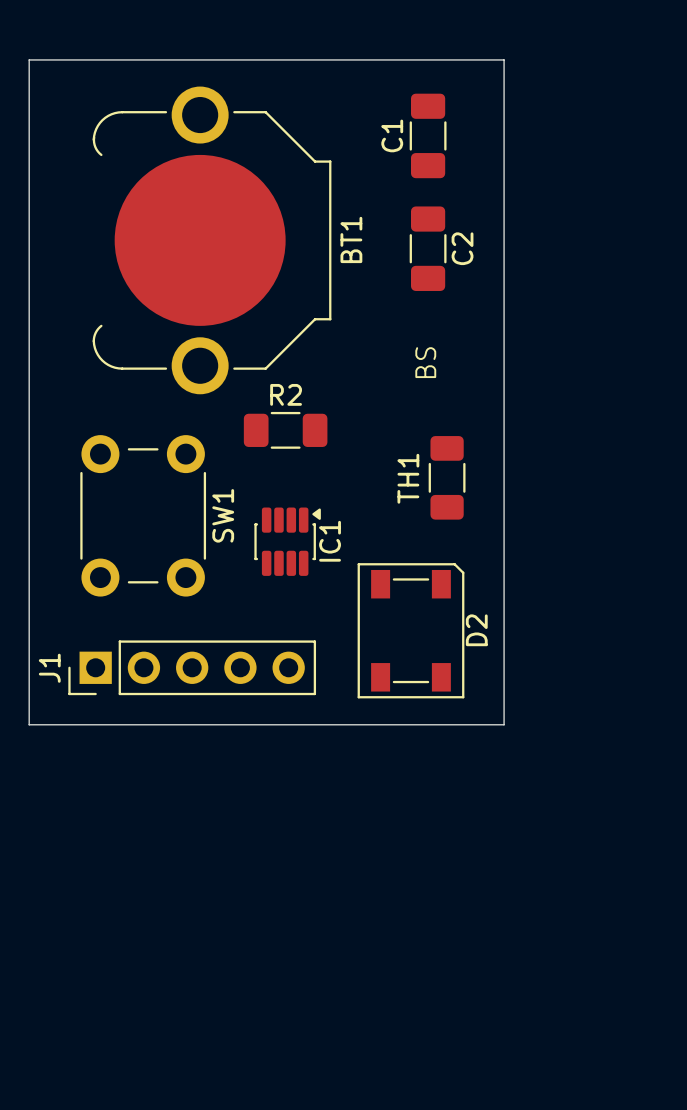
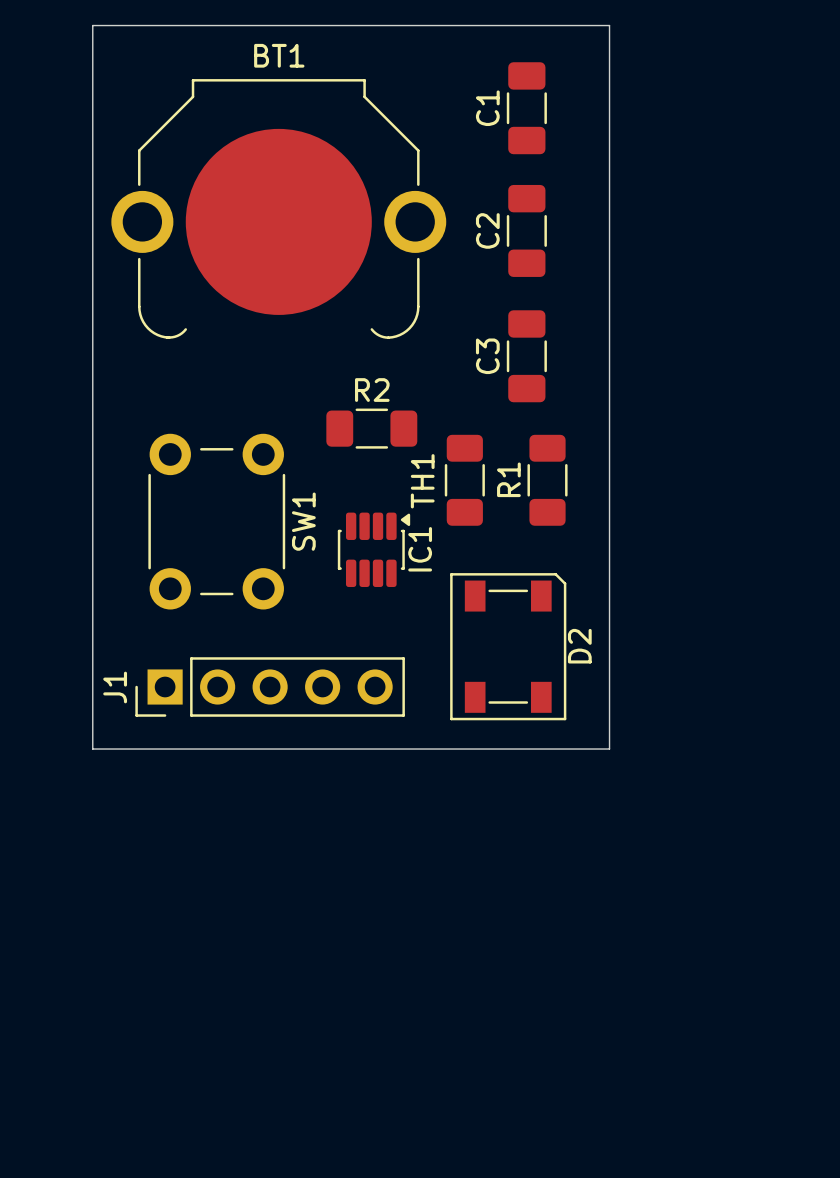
BT1 rotation: 0° (212, 240) -> 90° counterclockwise (278, 208)
C2 name position: C2 (462, 248) -> C2 (487, 230)
text: BS (425, 362) -> none
C3: none -> (526, 356)
TH1: none -> (464, 480)
TH1 name: TH1 (408, 478) -> R1 (508, 479)

